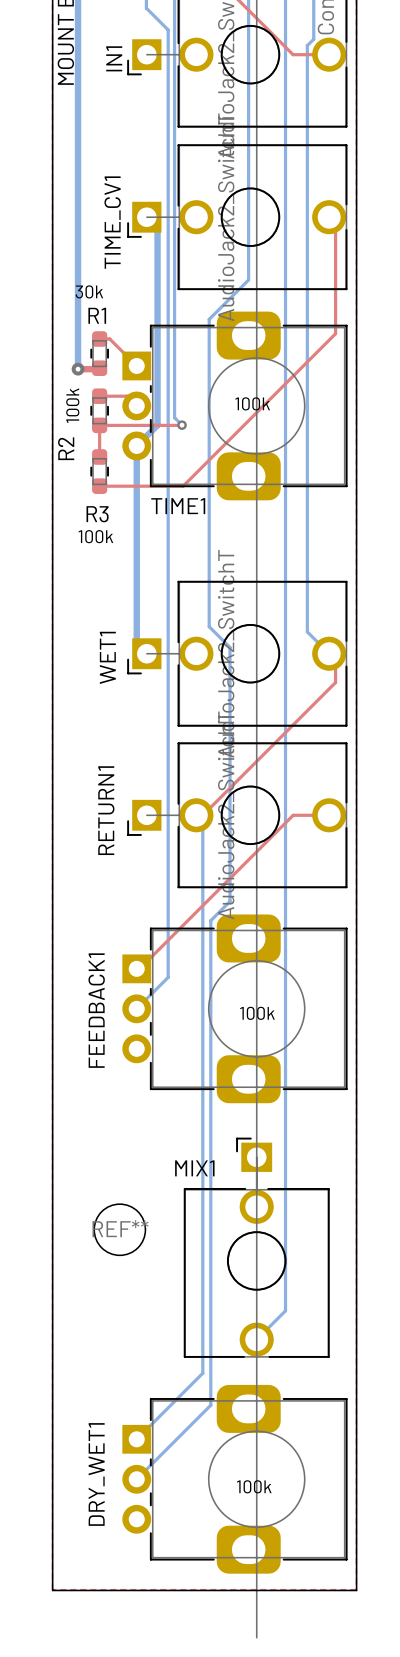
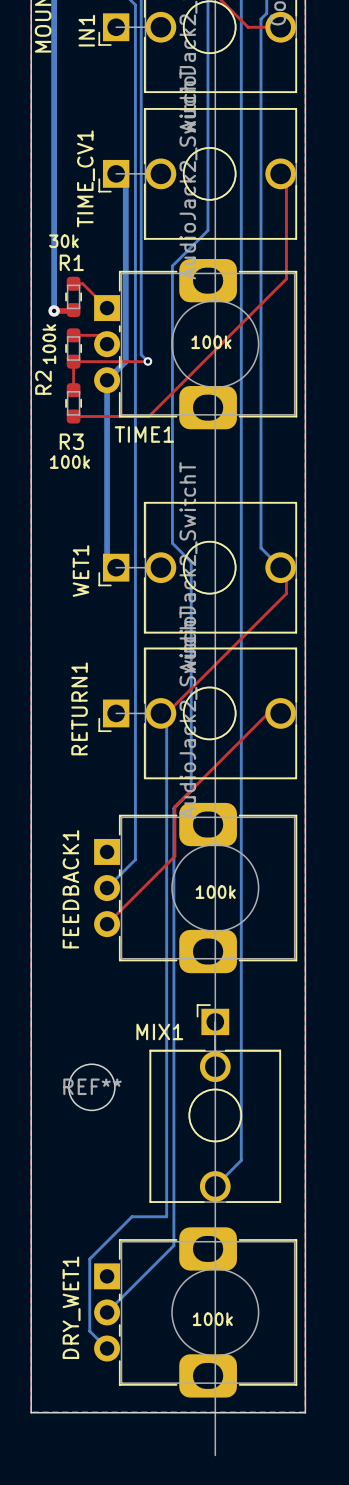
top track: (315, 815) (293, 815) (139, 968) -> (268, 713) (174, 806) (174, 856) (107, 924)
bottom track: (202, 1373) (136, 1439) -> (166, 1216) (132, 1216) (89, 1259) (89, 1331) (107, 1348)

